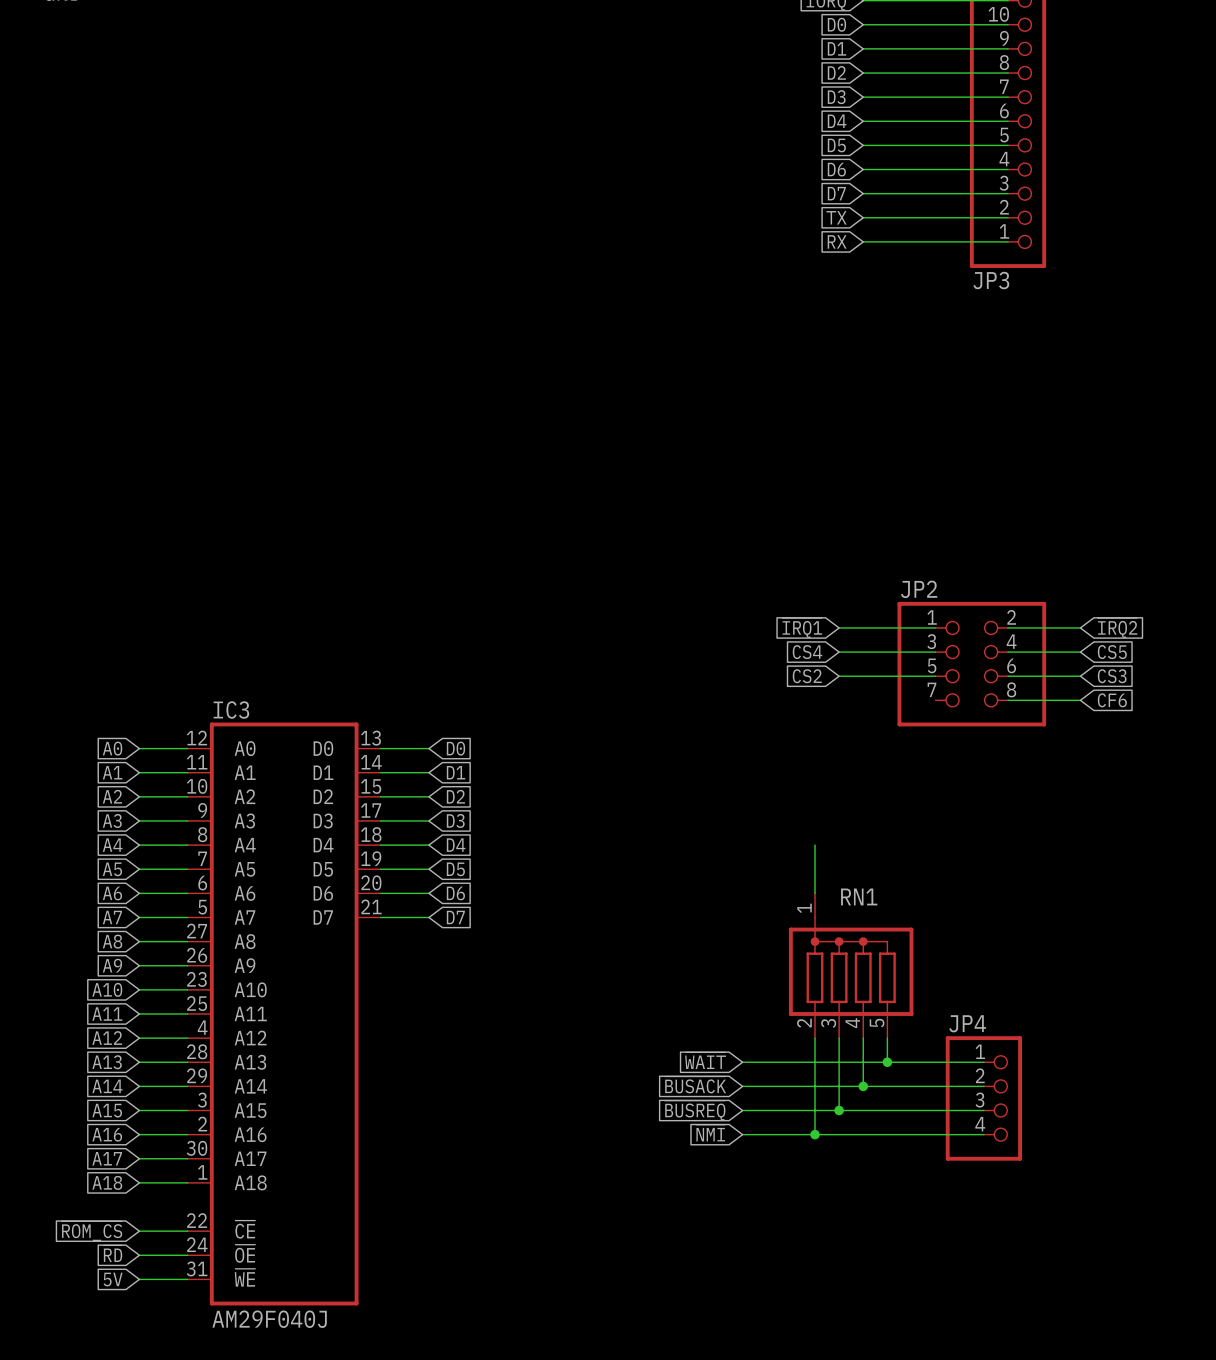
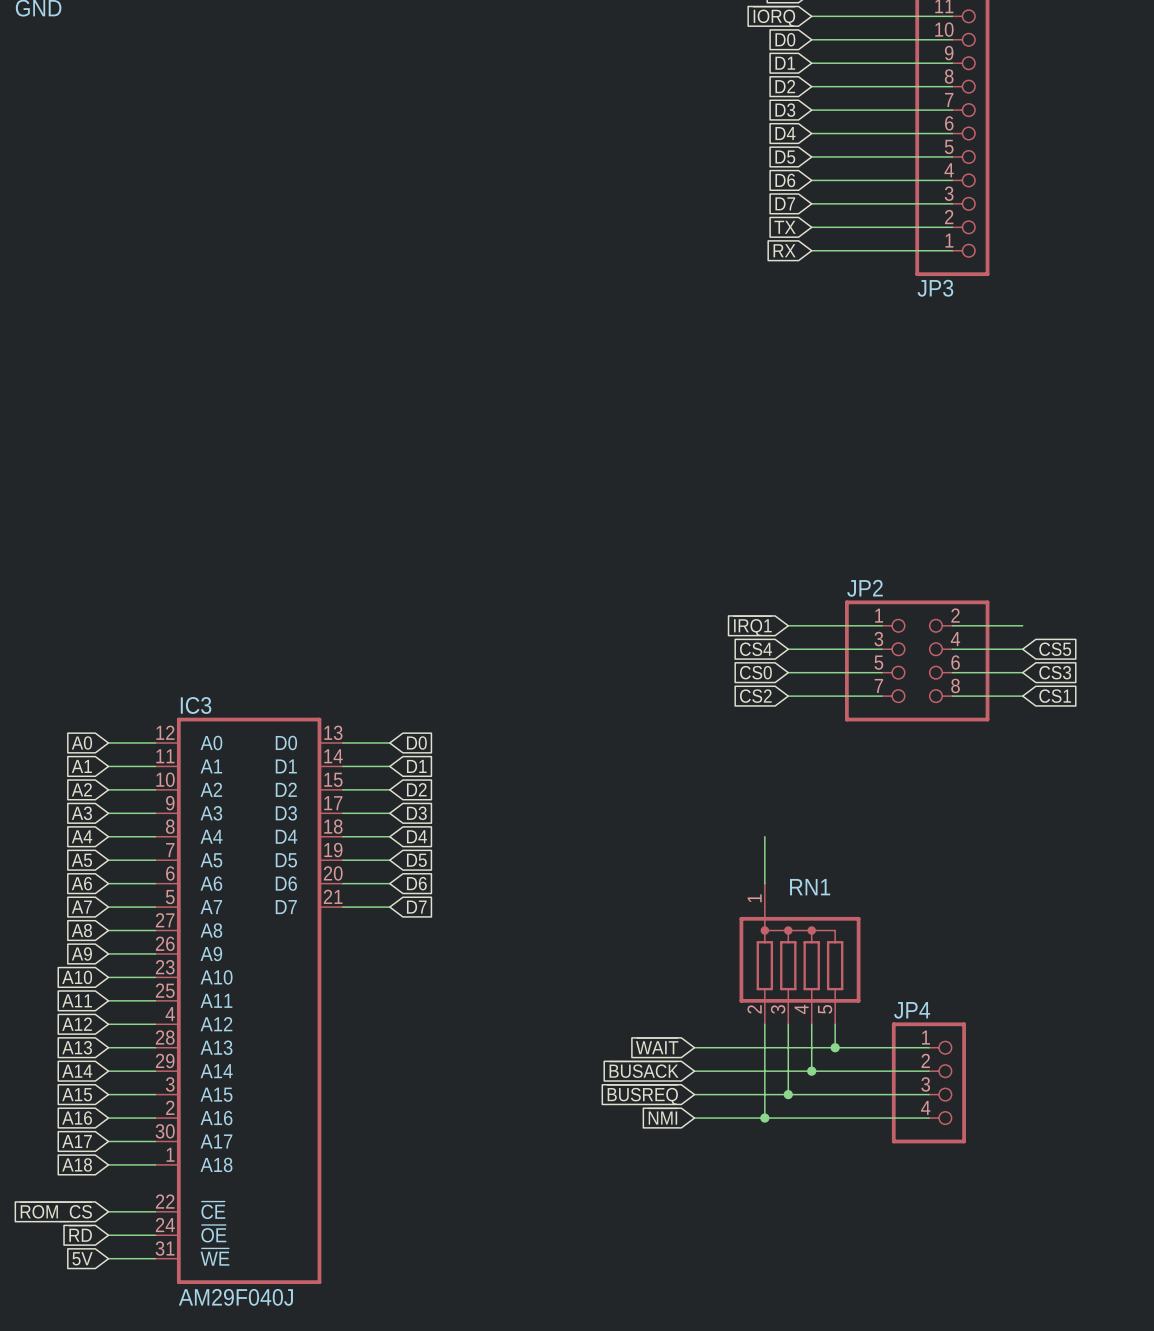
global label: ~{IRQ2} (1117, 627) -> none
global label: CS2 (807, 676) -> CS0 (755, 672)
global label: none -> CS2 (755, 696)
wire: none -> (788, 696) (882, 696)
global label: CF6 (1112, 700) -> CS1 (1055, 696)

